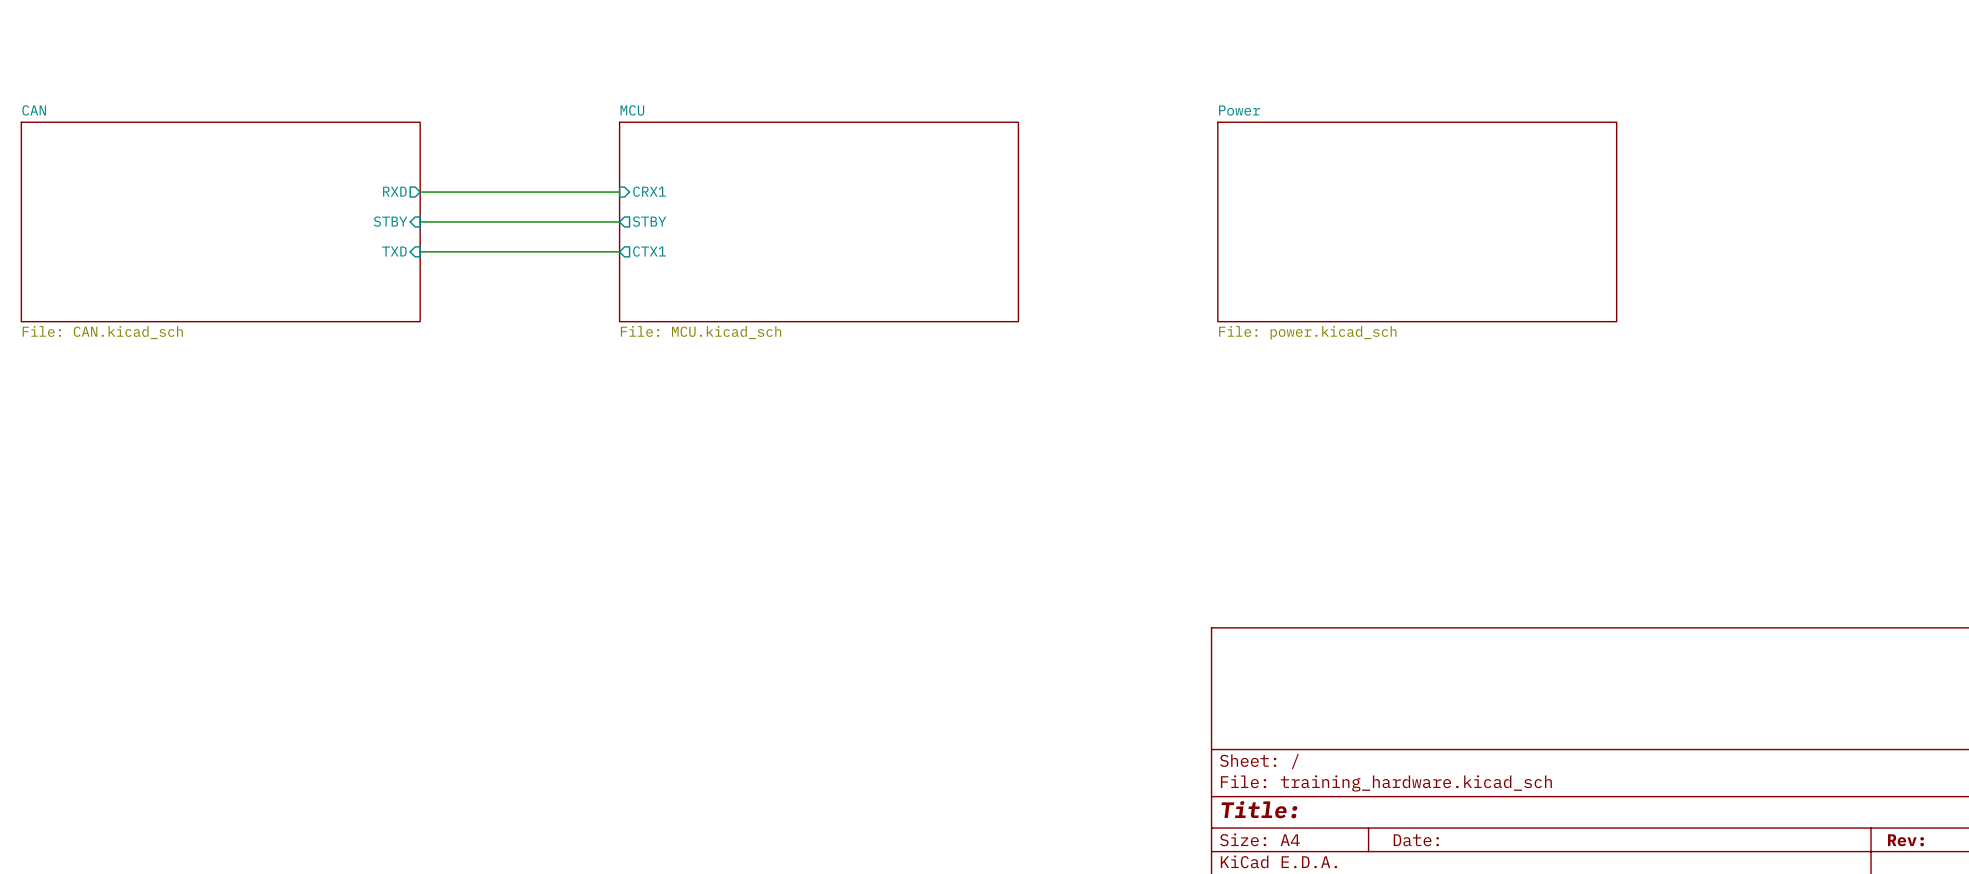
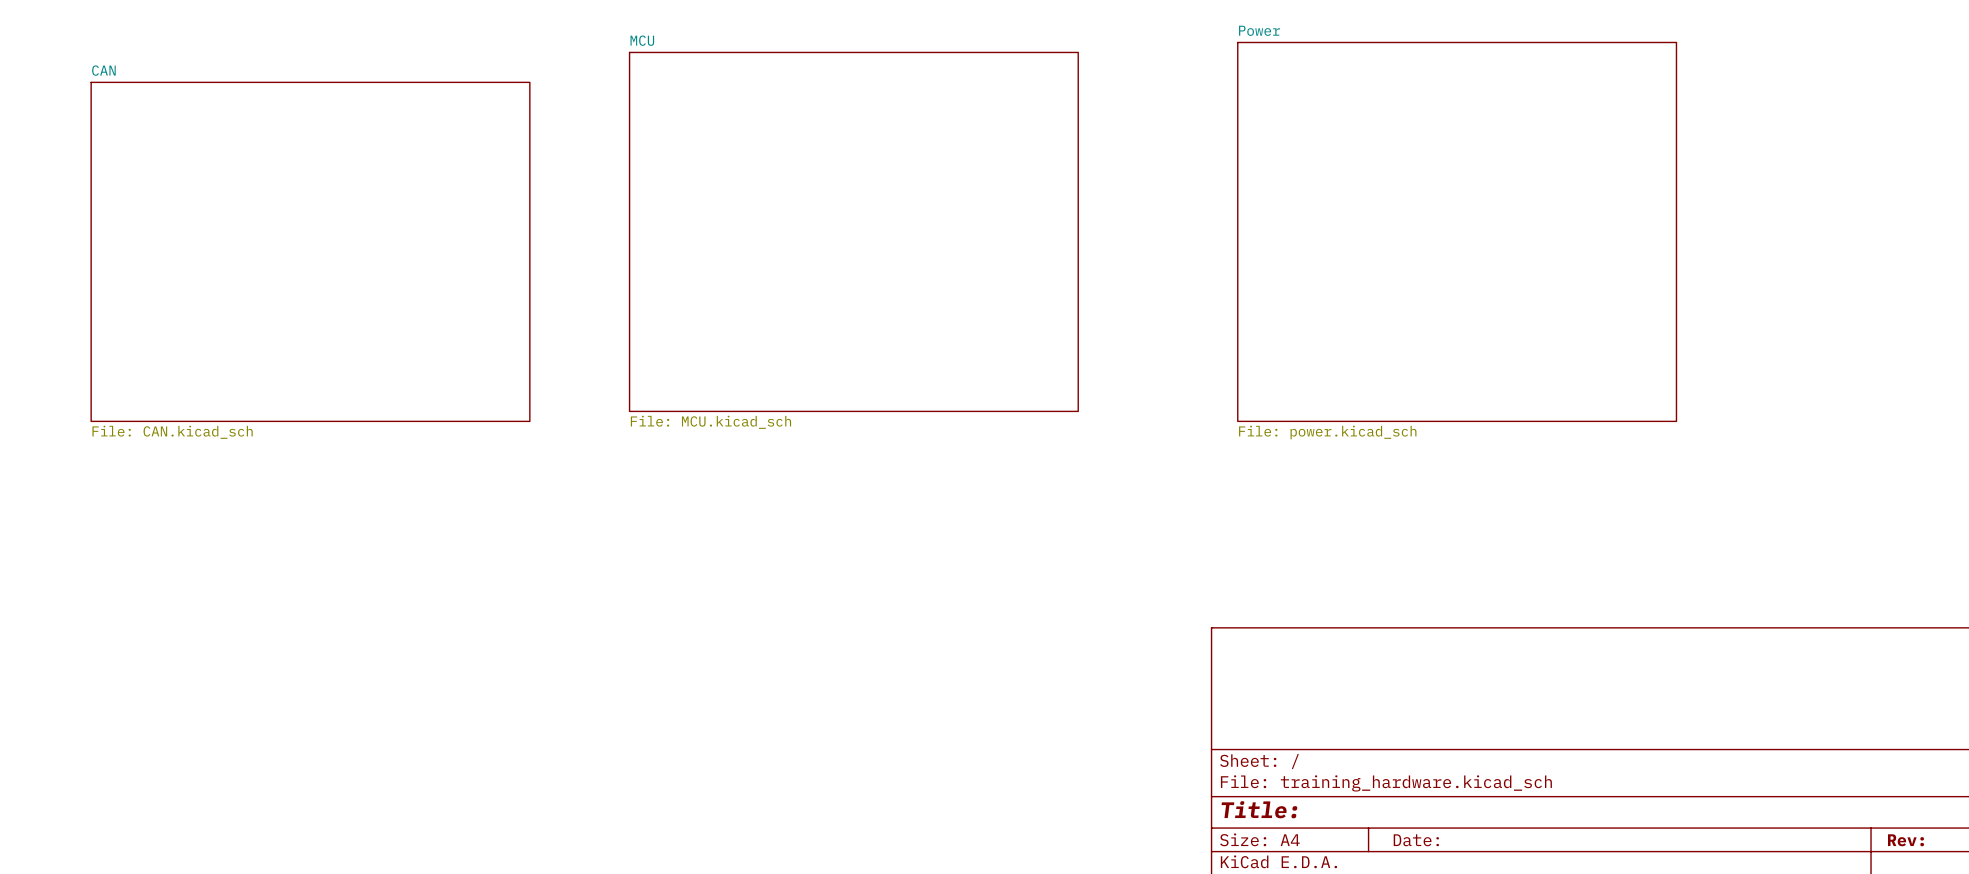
sheet pin: RXD (394, 191) -> none
sheet pin: CRX1 (649, 191) -> none
wire: (420, 192) (619, 192) -> none
sheet CAN: File: CAN.kicad_sch (220, 221) -> none
sheet pin: STBY (390, 221) -> none
wire: (420, 221) (619, 221) -> none
sheet pin: STBY (649, 221) -> none
sheet MCU: File: MCU.kicad_sch (819, 221) -> none
sheet Power: File: power.kicad_sch (1417, 221) -> none
sheet MCU: none -> File: MCU.kicad_sch (853, 231)
sheet Power: none -> File: power.kicad_sch (1457, 231)
sheet CAN: none -> File: CAN.kicad_sch (310, 251)
sheet pin: TXD (394, 251) -> none
wire: (420, 251) (619, 251) -> none
sheet pin: CTX1 (649, 251) -> none

